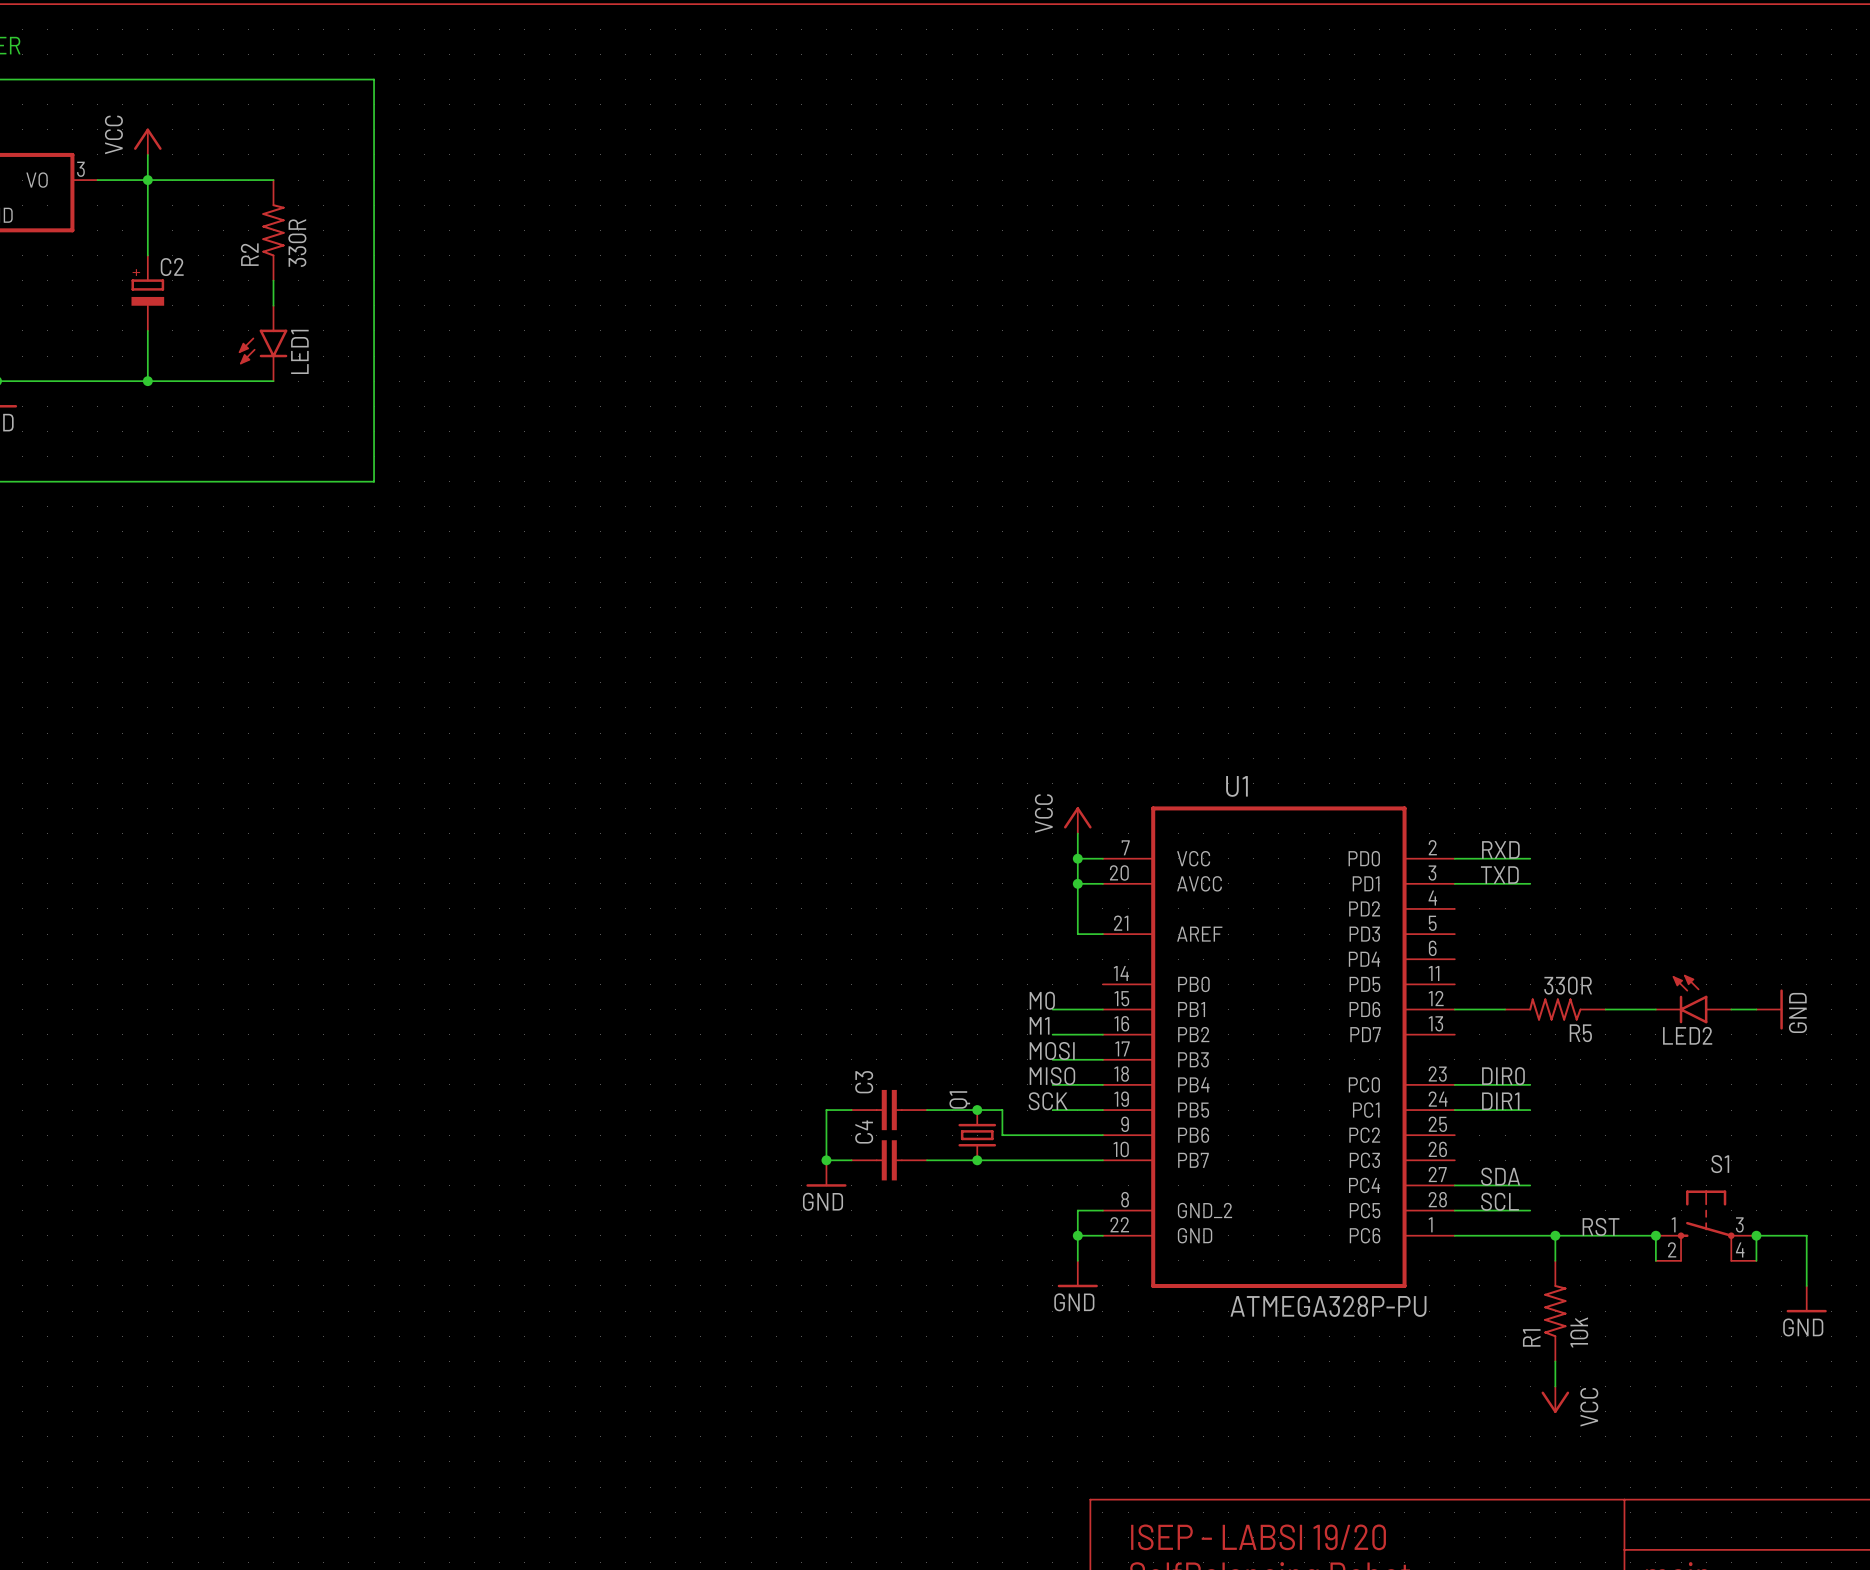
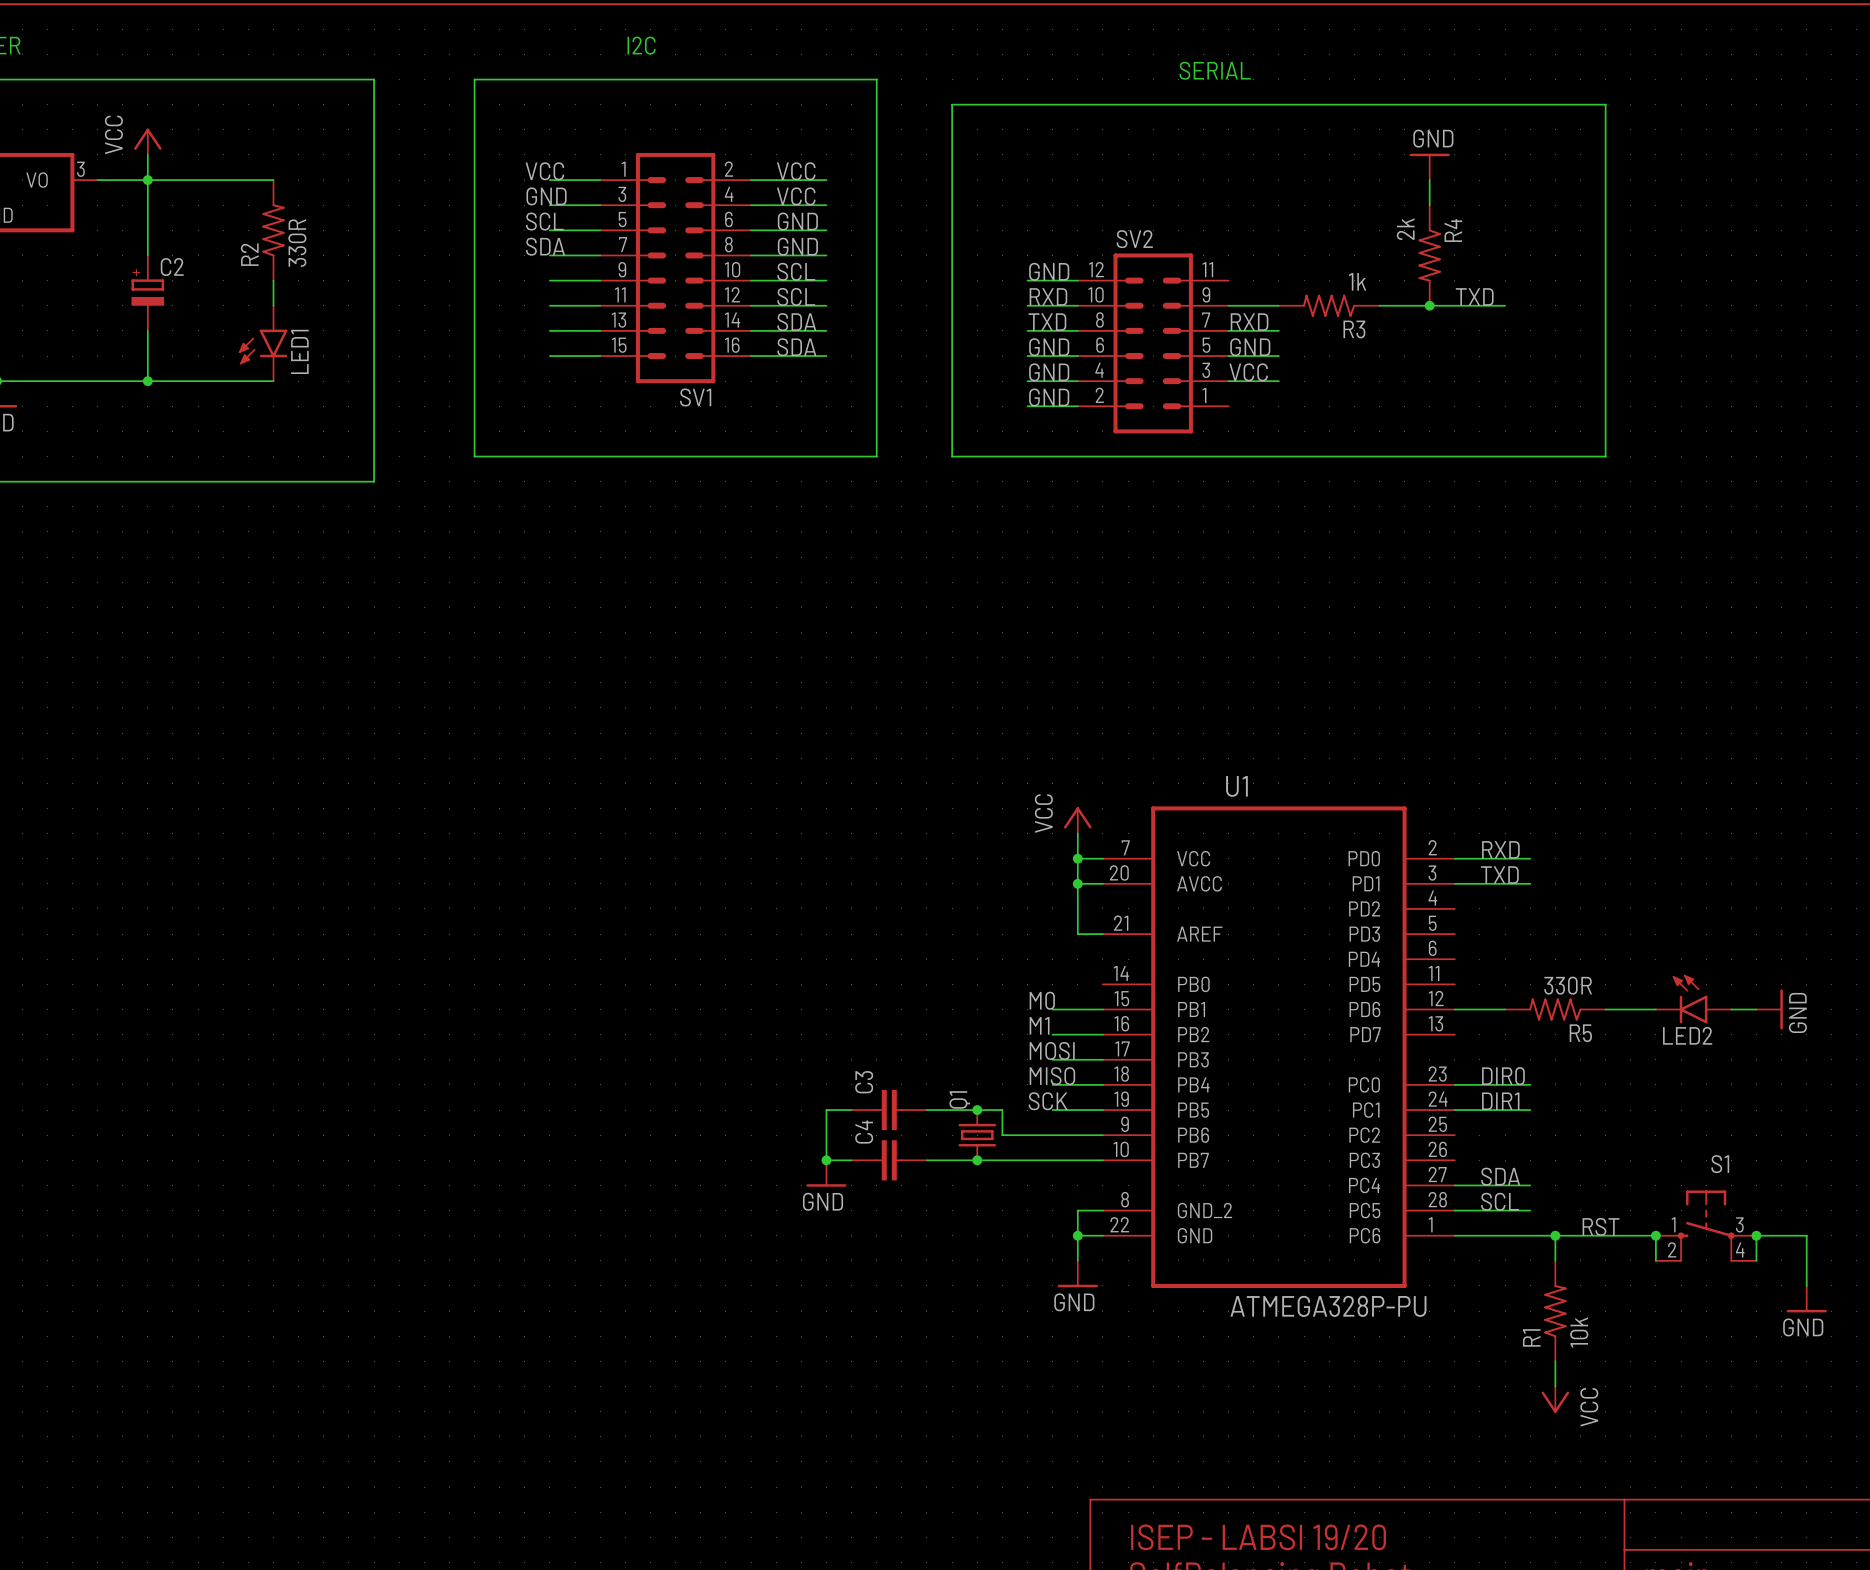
text: none -> I2C (641, 45)
text: none -> SERIAL (1215, 70)
wire: none -> (474, 79) (876, 79) (876, 456) (474, 456) (474, 79)
wire: none -> (952, 104) (952, 456) (1605, 456) (1605, 104) (952, 104)
power symbol: none -> GND (1429, 166)
label: none -> VCC (544, 171)
label: none -> VCC (796, 171)
wire: none -> (549, 180) (600, 180)
wire: none -> (751, 180) (826, 180)
wire: none -> (1429, 180) (1429, 205)
label: none -> GND (546, 196)
label: none -> VCC (796, 196)
wire: none -> (549, 205) (600, 205)
wire: none -> (751, 205) (826, 205)
label: none -> SCL (544, 221)
label: none -> GND (797, 221)
wire: none -> (549, 230) (600, 230)
wire: none -> (751, 230) (826, 230)
label: none -> SDA (545, 246)
label: none -> GND (797, 246)
wire: none -> (549, 255) (600, 255)
wire: none -> (751, 255) (826, 255)
R4: none -> 2k (1429, 255)
SV1: none -> (675, 268)
label: none -> SCL (796, 271)
label: none -> GND (1049, 271)
wire: none -> (549, 280) (600, 280)
wire: none -> (751, 280) (826, 280)
wire: none -> (1027, 280) (1077, 280)
label: none -> SCL (796, 296)
label: none -> RXD (1048, 296)
label: none -> TXD (1474, 296)
wire: none -> (549, 305) (600, 305)
wire: none -> (751, 305) (826, 305)
wire: none -> (1027, 305) (1077, 305)
wire: none -> (1228, 305) (1278, 305)
R3: none -> 1k (1329, 305)
wire: none -> (1379, 305) (1505, 305)
junction: none -> (1429, 305)
label: none -> SDA (796, 322)
label: none -> TXD (1047, 322)
label: none -> RXD (1249, 322)
wire: none -> (549, 330) (600, 330)
wire: none -> (751, 330) (826, 330)
wire: none -> (1027, 330) (1077, 330)
wire: none -> (1228, 330) (1278, 330)
SV2: none -> (1153, 343)
label: none -> SDA (796, 347)
label: none -> GND (1049, 347)
label: none -> GND (1250, 347)
wire: none -> (549, 356) (600, 356)
wire: none -> (751, 356) (826, 356)
wire: none -> (1027, 356) (1077, 356)
wire: none -> (1228, 356) (1278, 356)
label: none -> GND (1049, 372)
label: none -> VCC (1248, 372)
wire: none -> (1027, 381) (1077, 381)
wire: none -> (1228, 381) (1278, 381)
label: none -> GND (1049, 397)
wire: none -> (1027, 406) (1077, 406)

